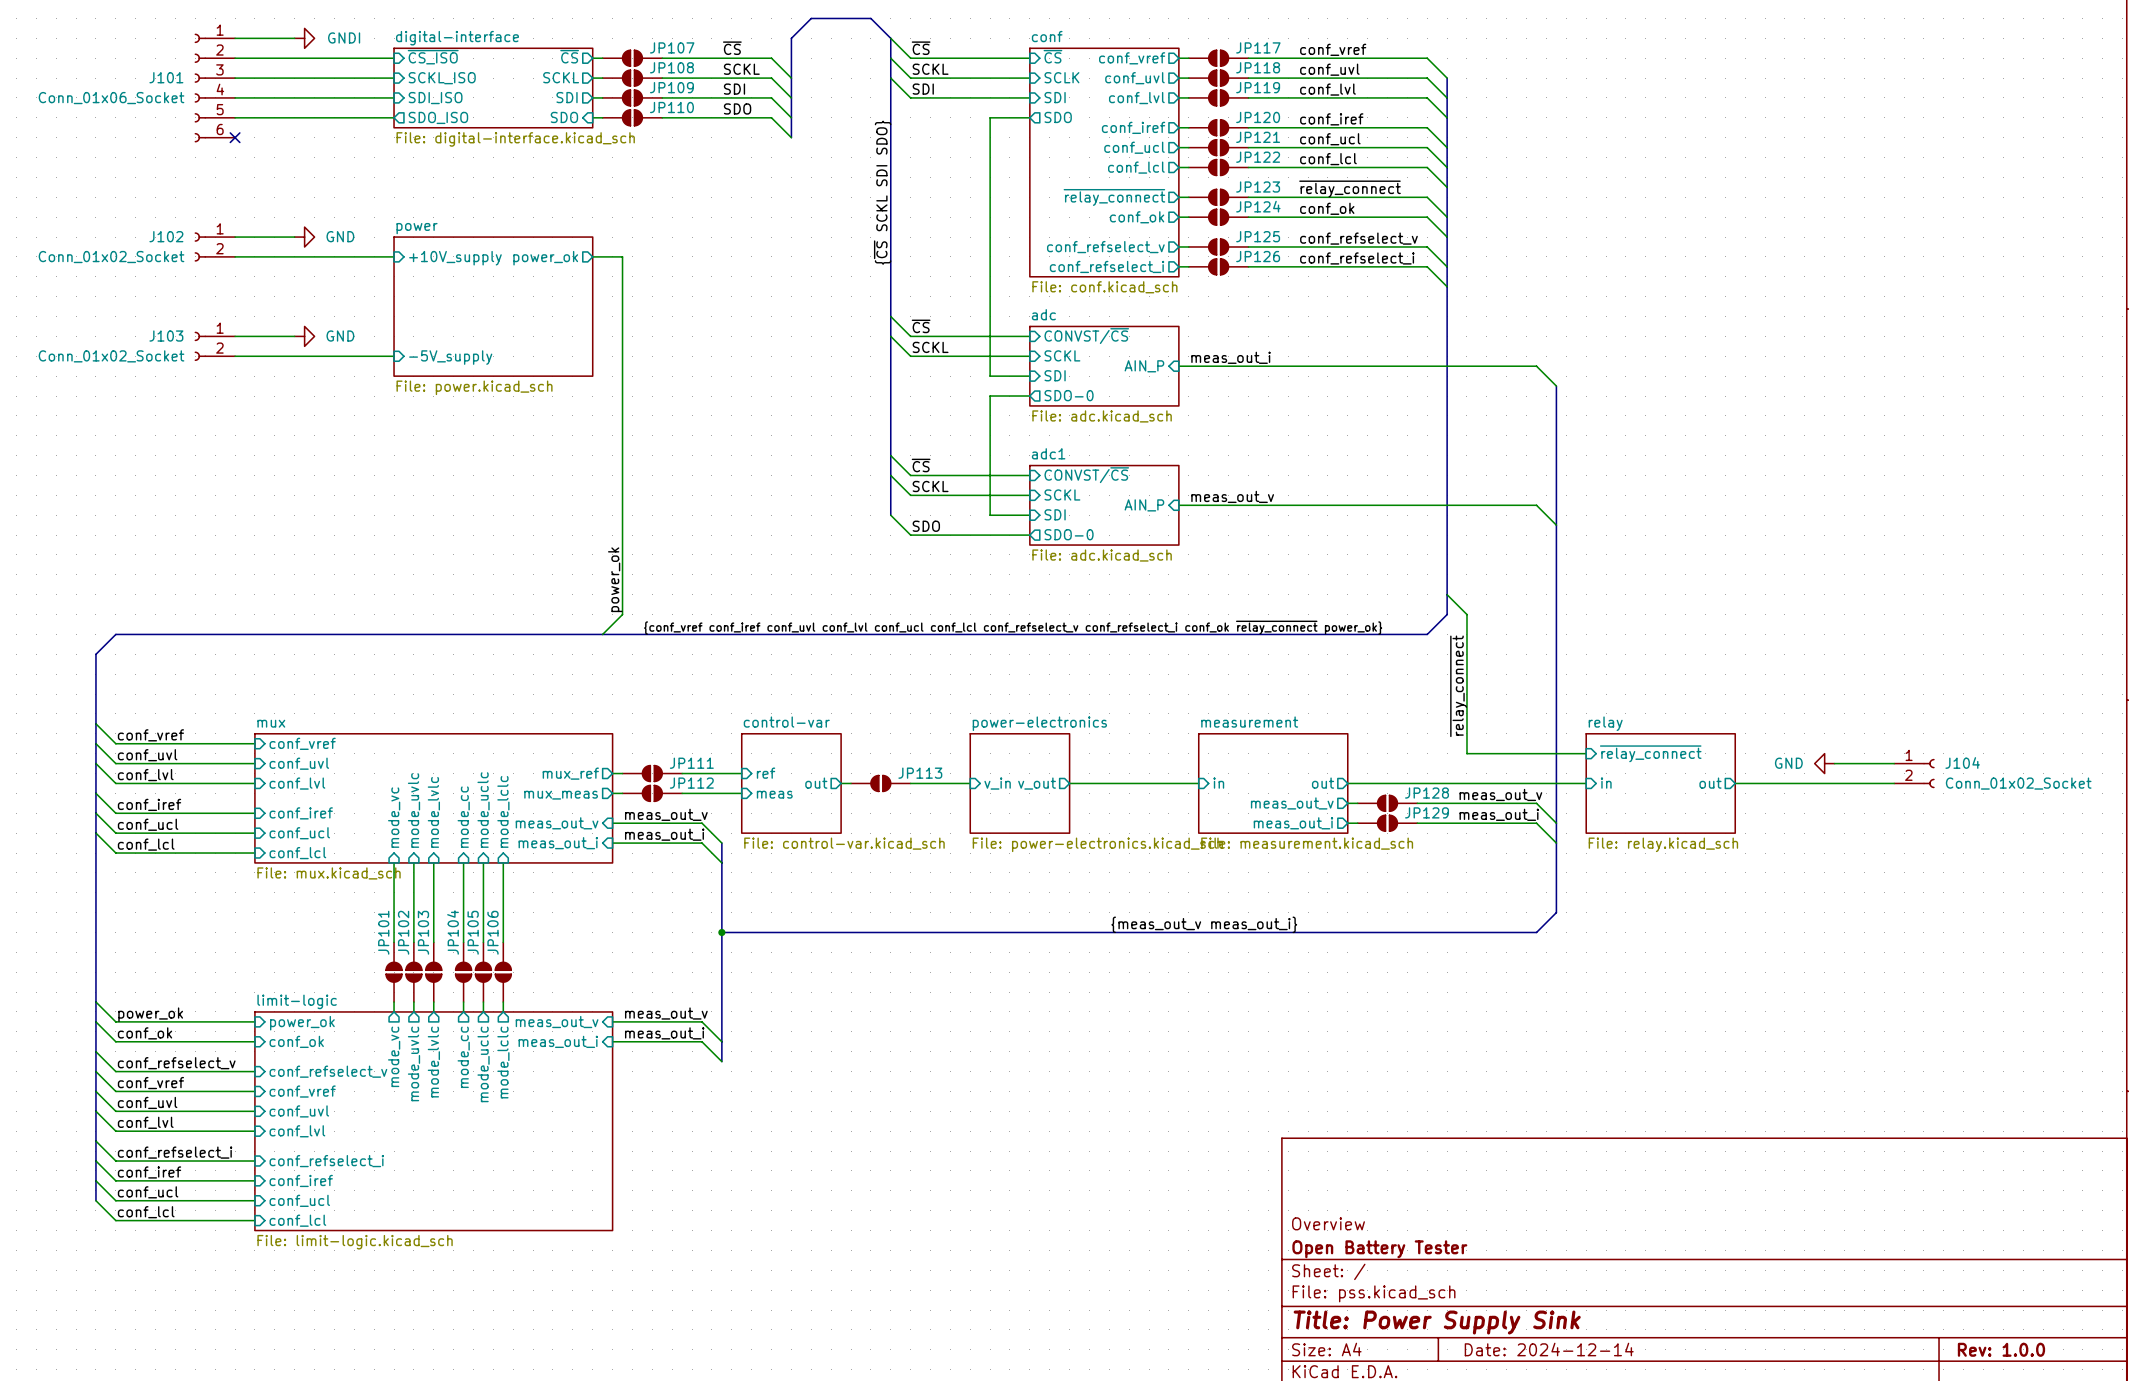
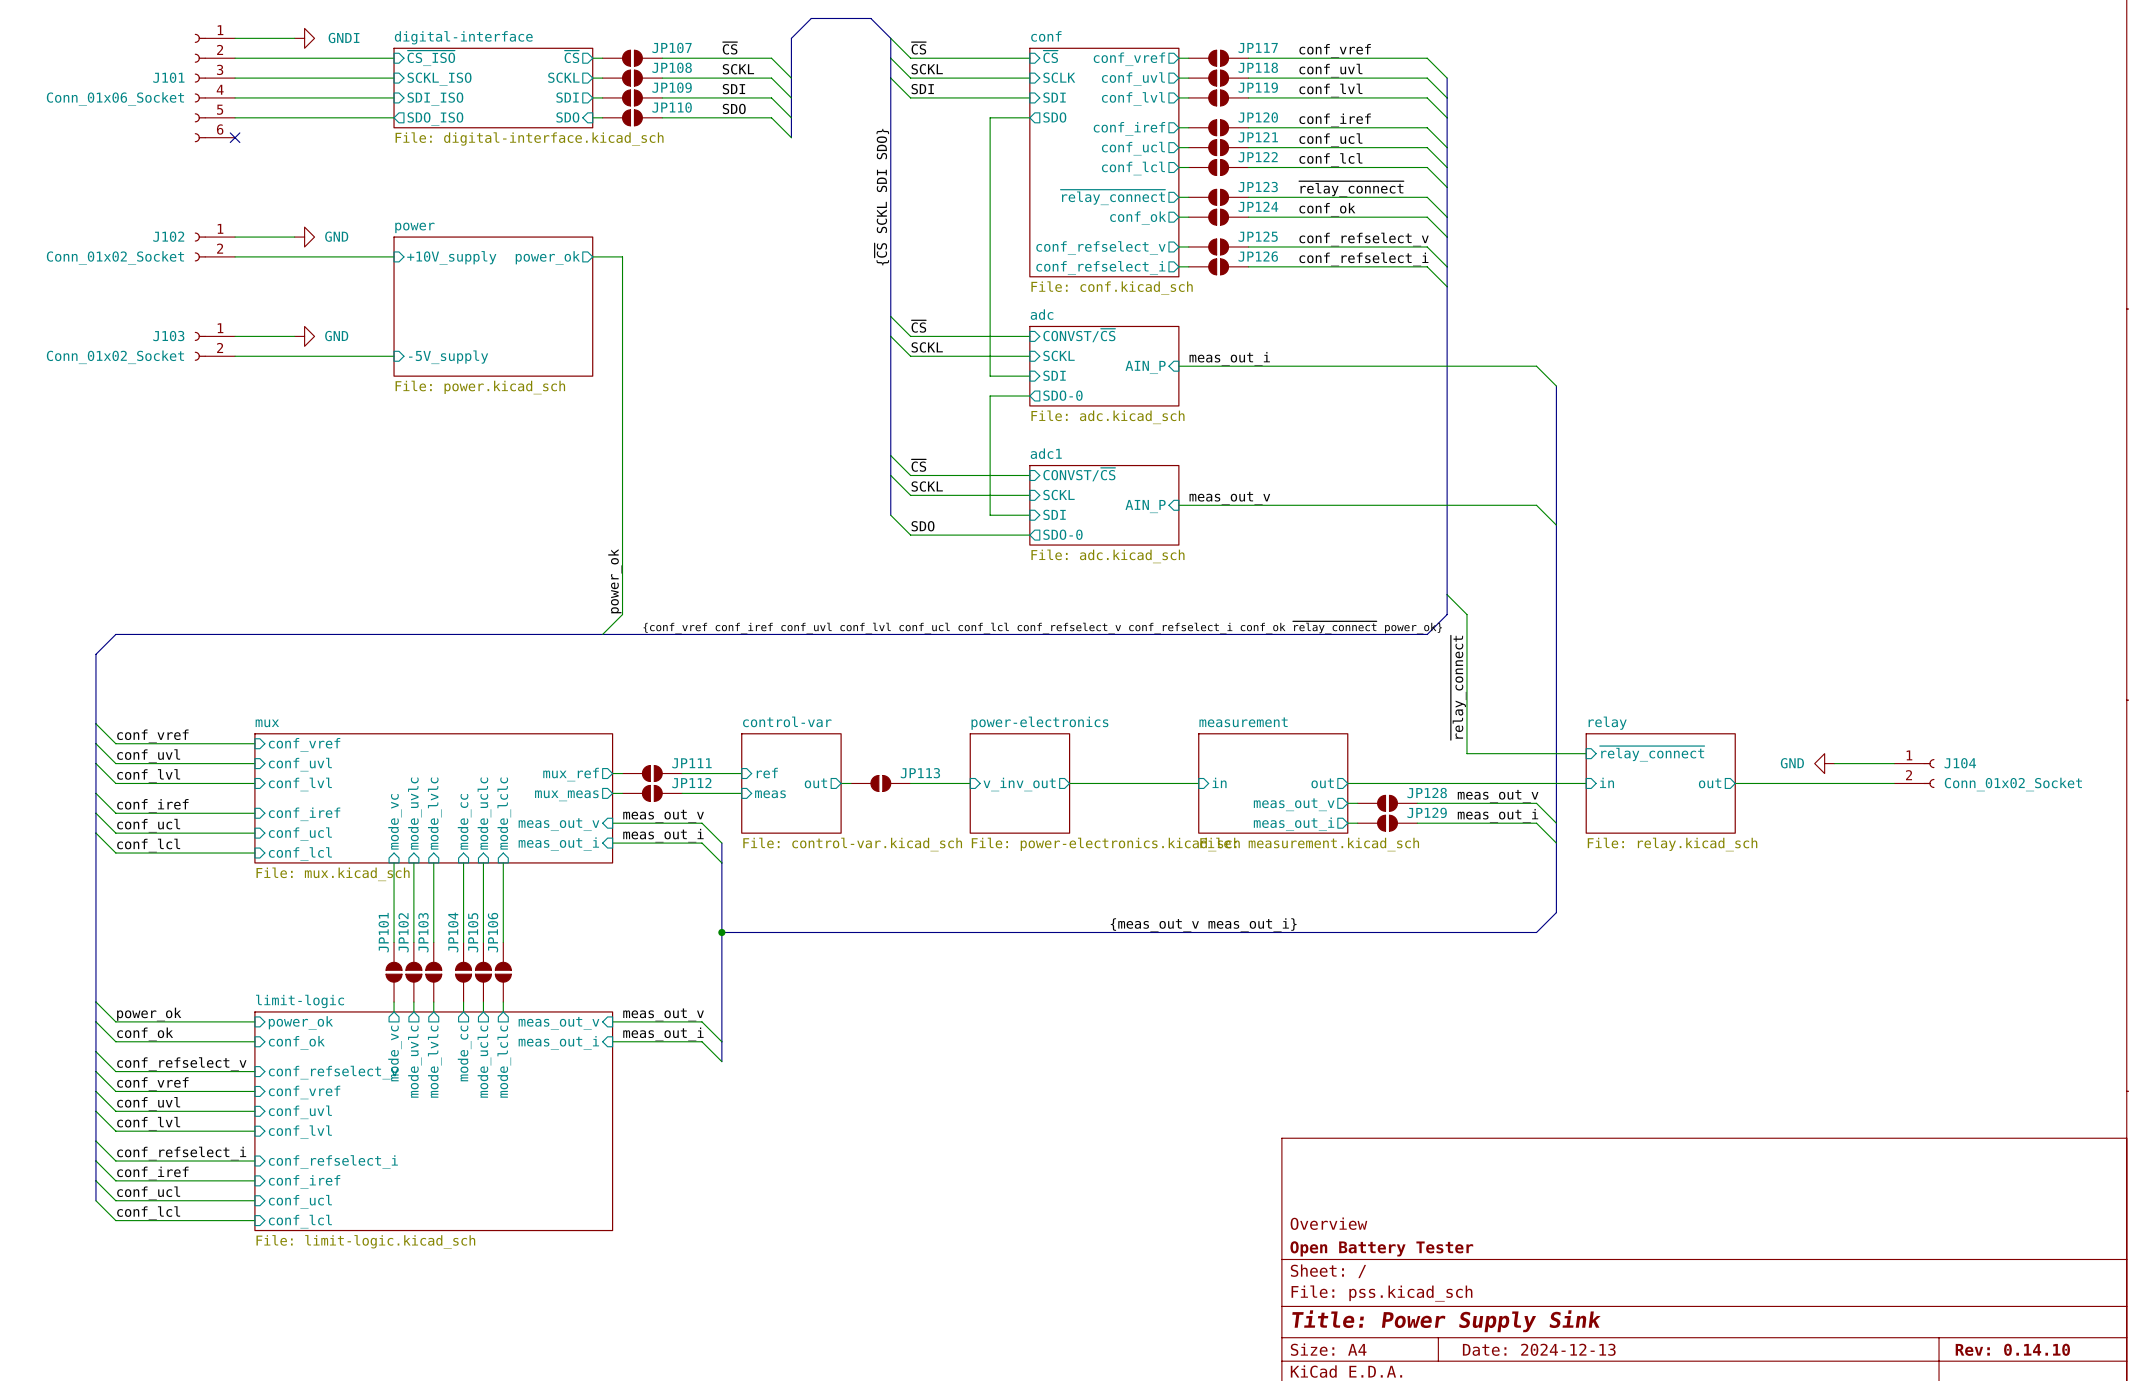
title block: Date: 2024-12-14 (1549, 1349) -> Date: 2024-12-13 (1539, 1349)
title block: Rev: 1.0.0 (2001, 1349) -> Rev: 0.14.10 (2012, 1349)

